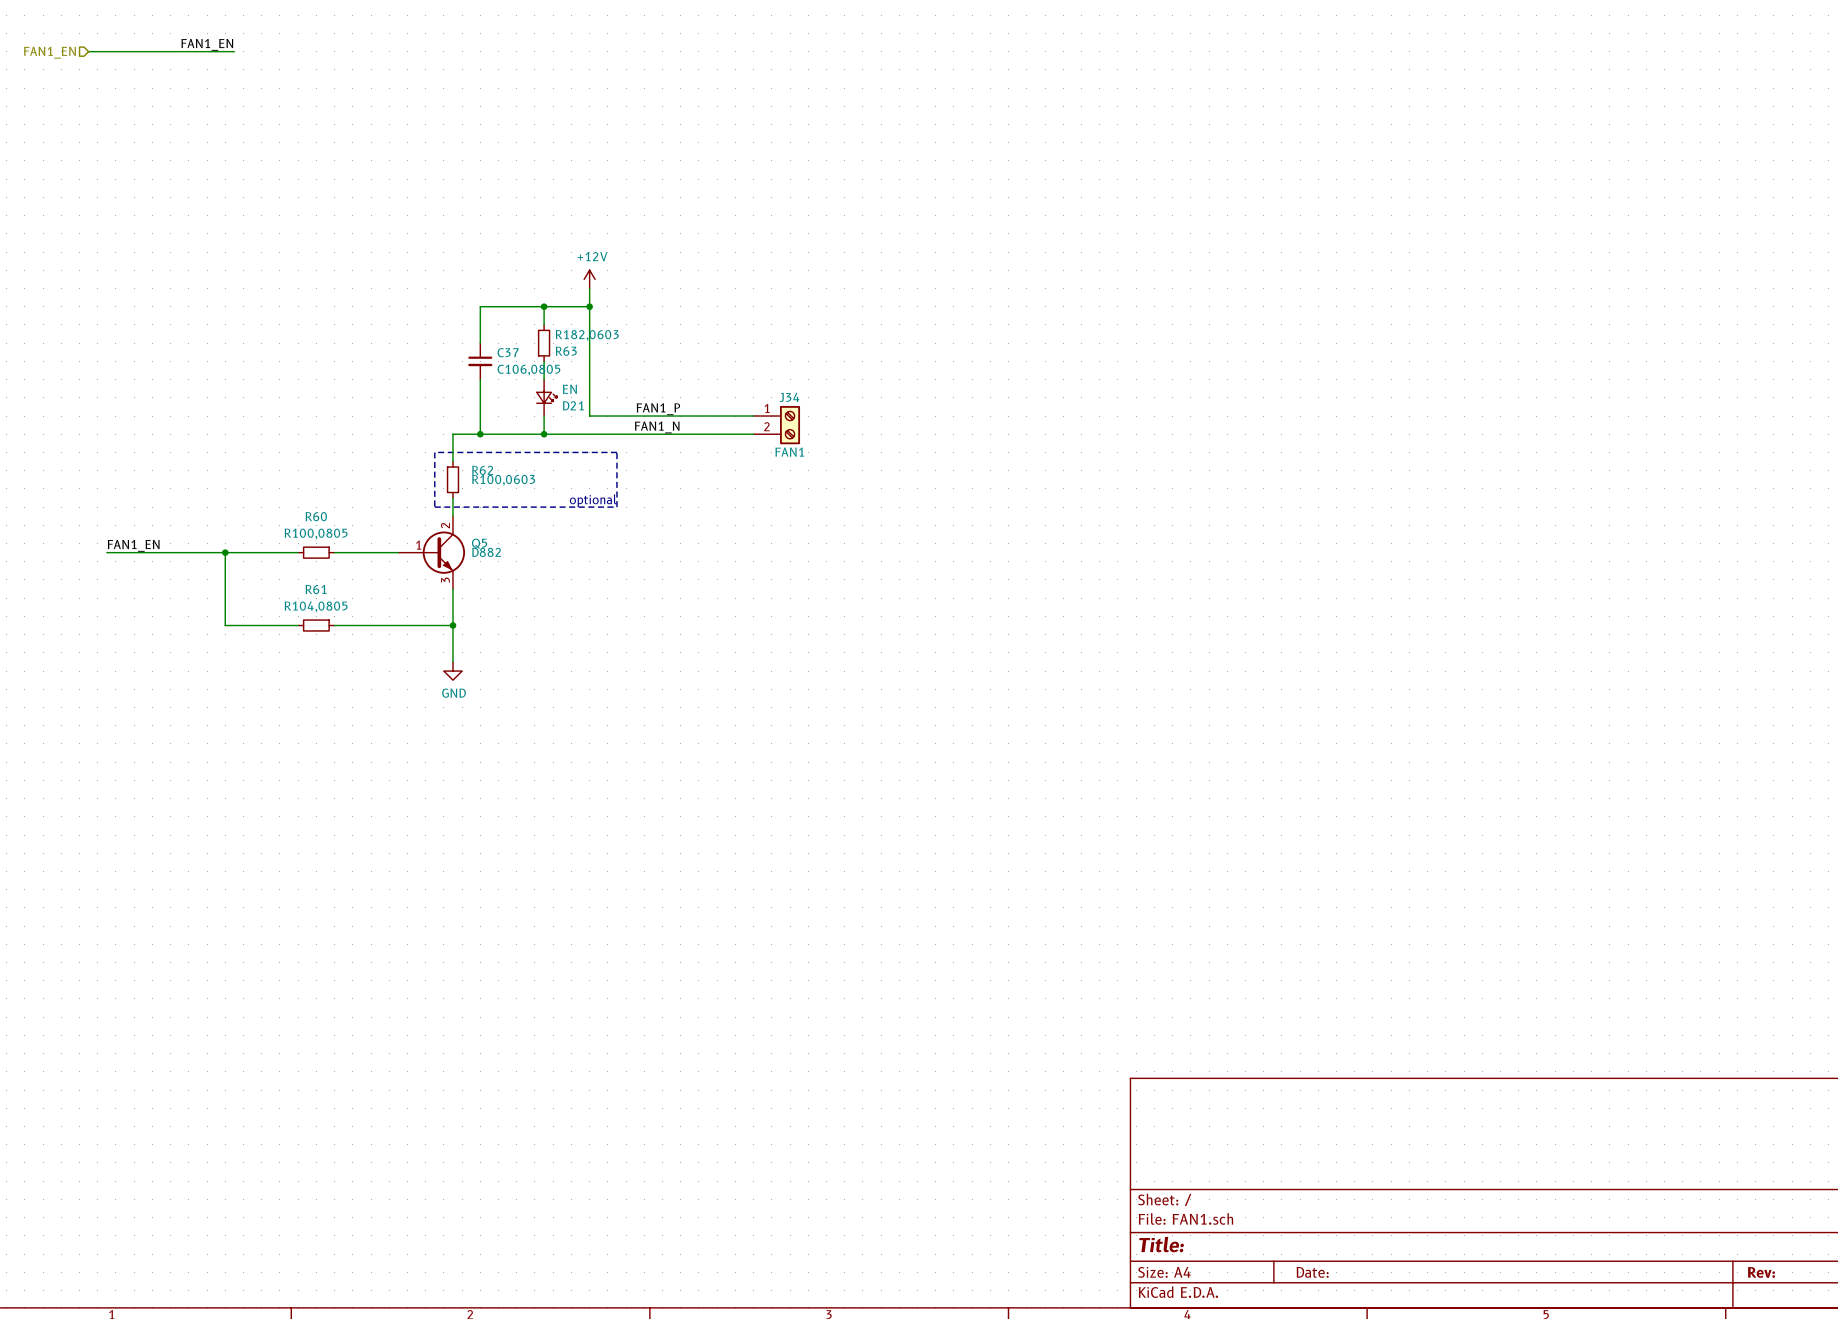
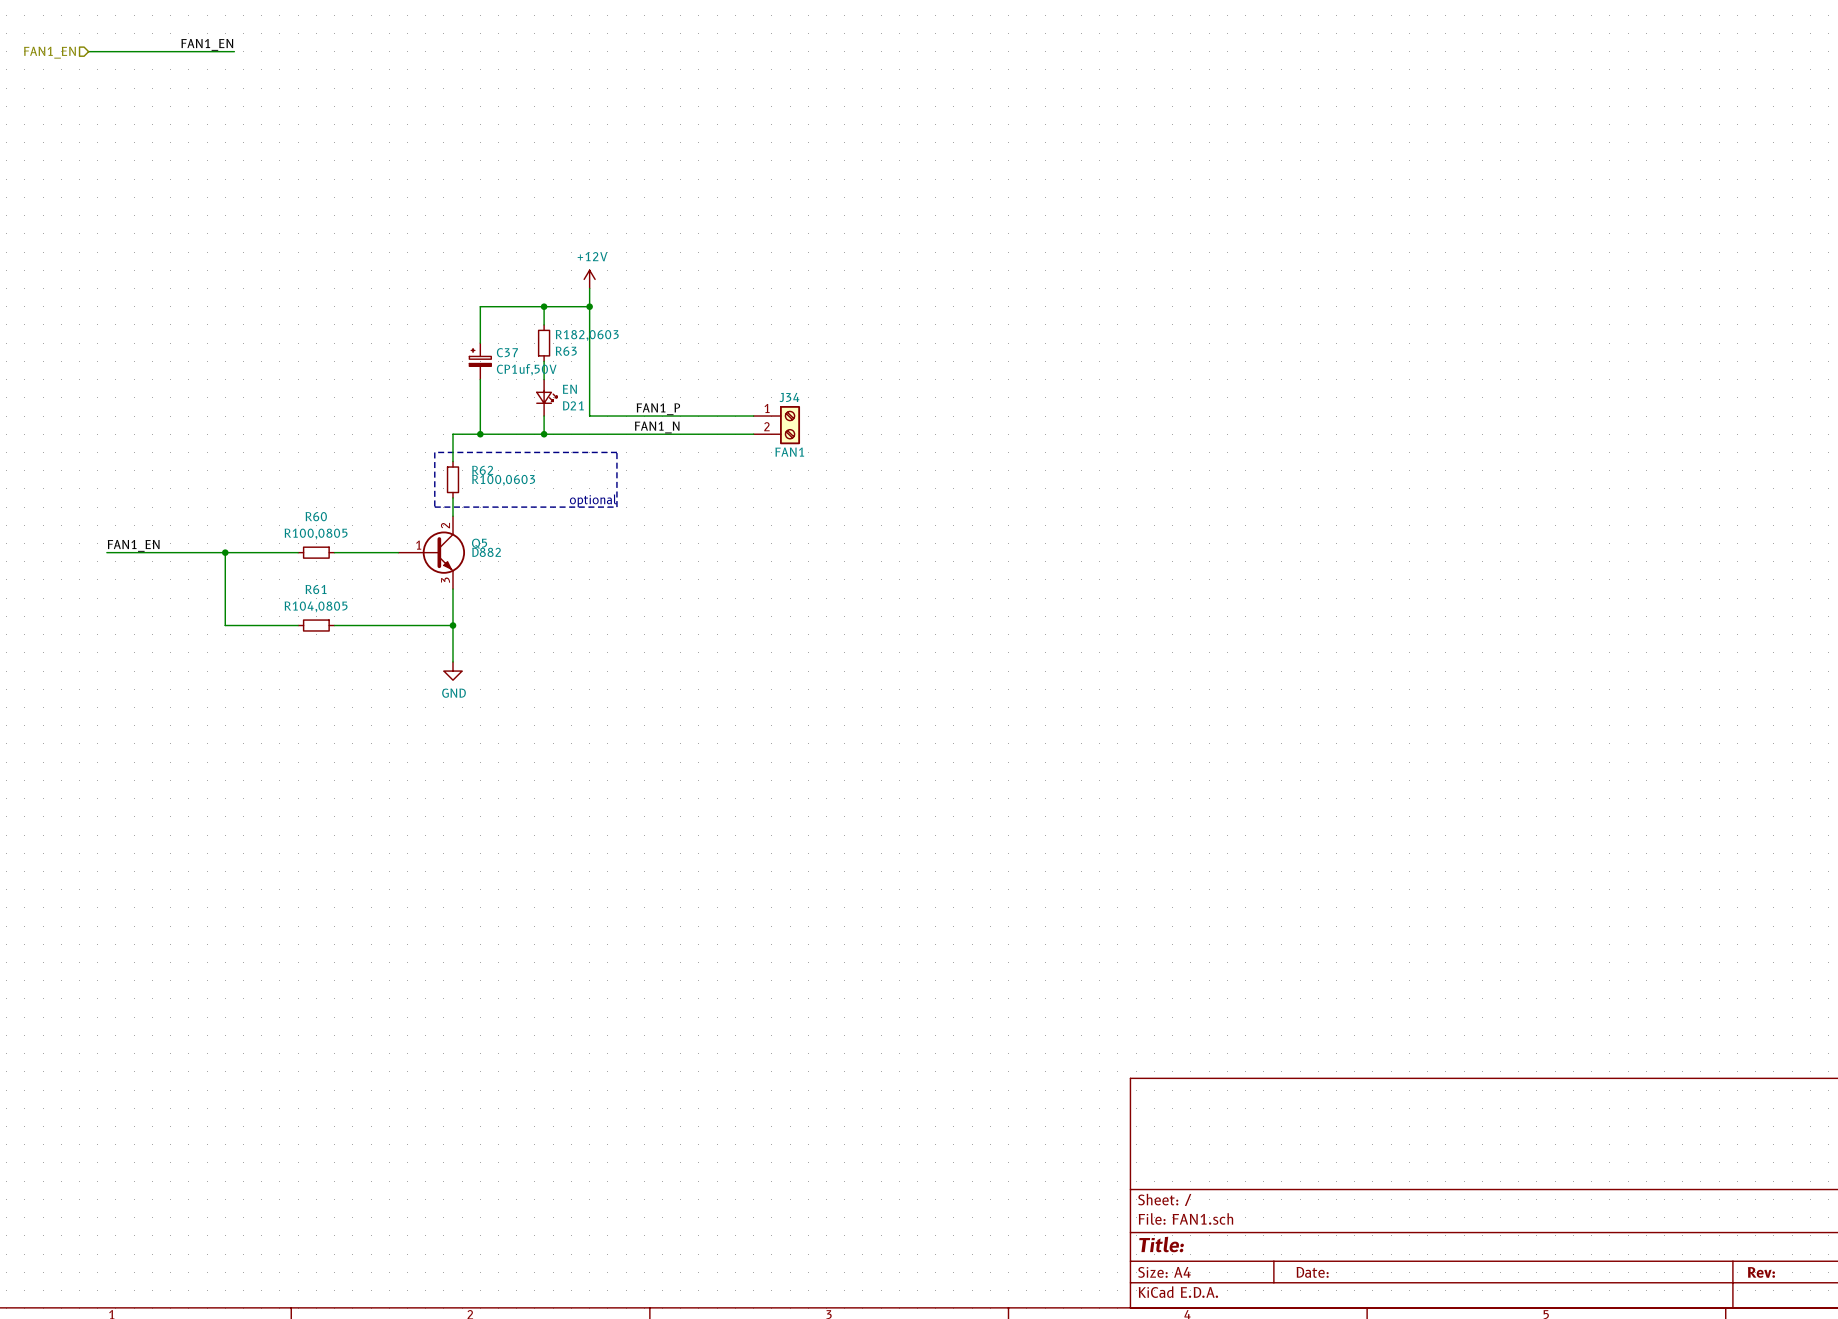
C37 symbol: [468, 343, 493, 380] -> [469, 343, 492, 380]
C37 value: C106,0805 (528, 370) -> CP1uf,50V (526, 369)

